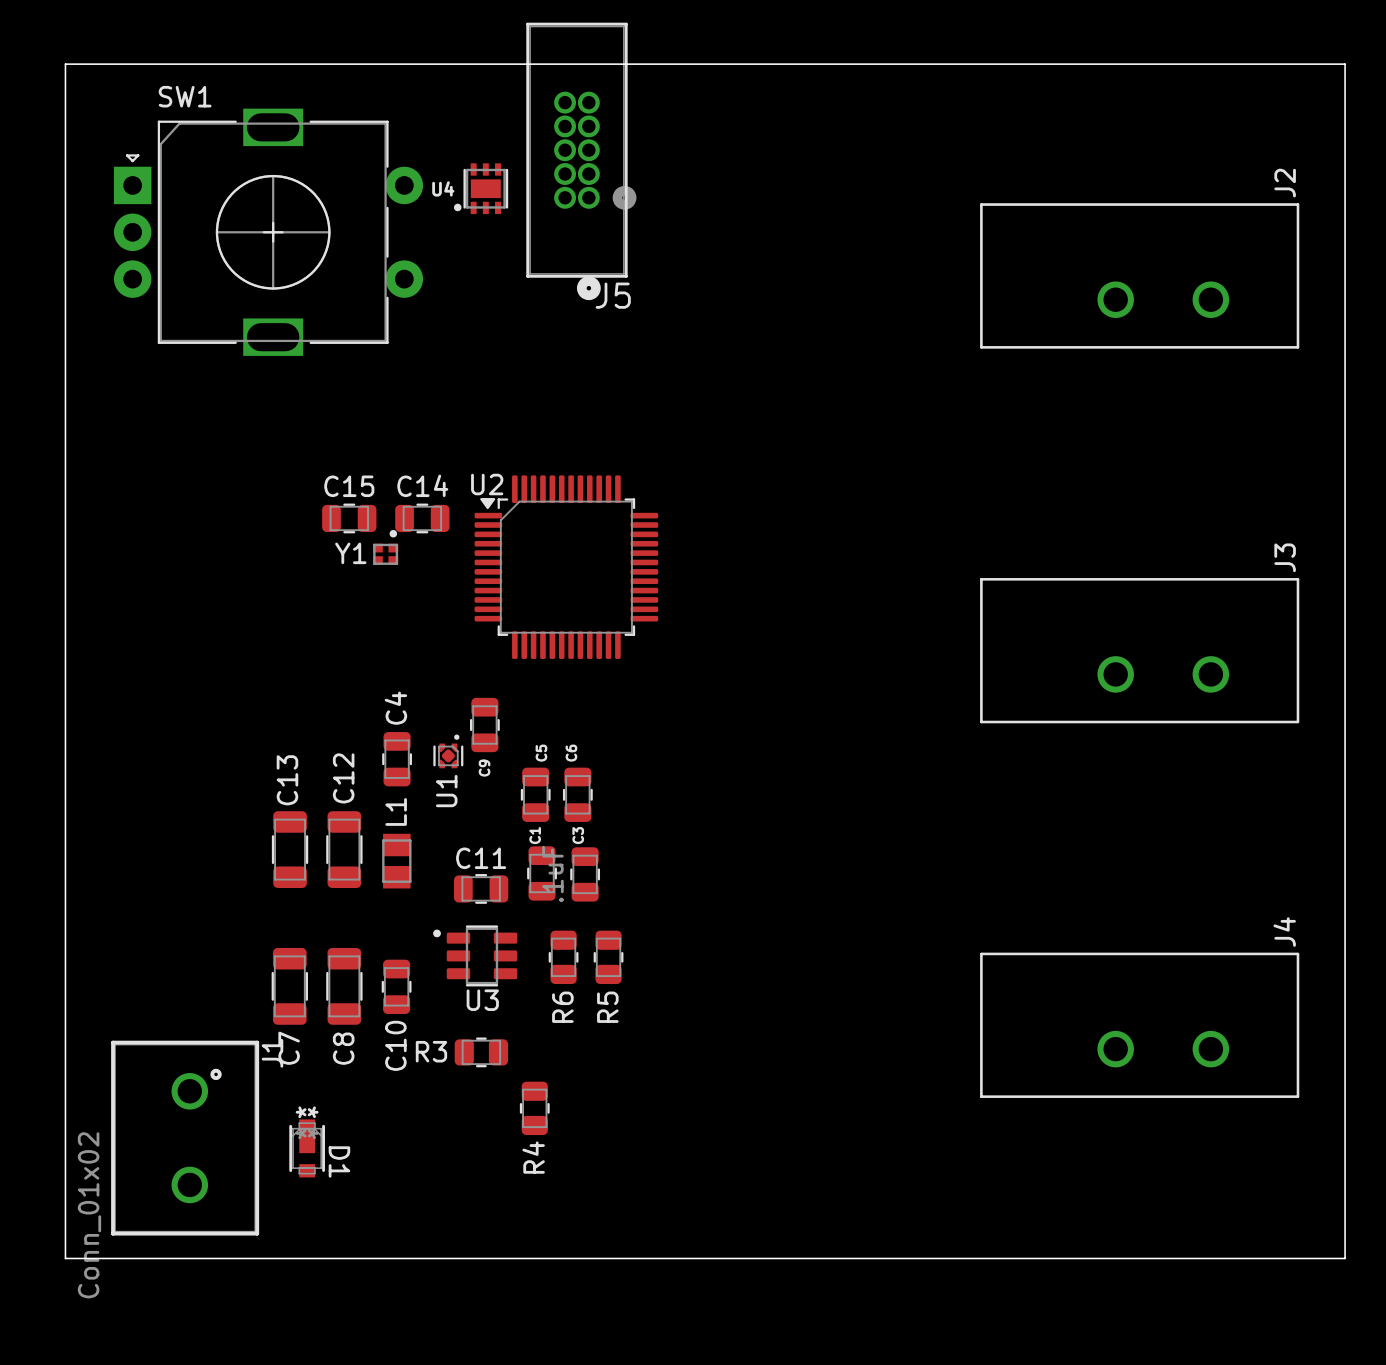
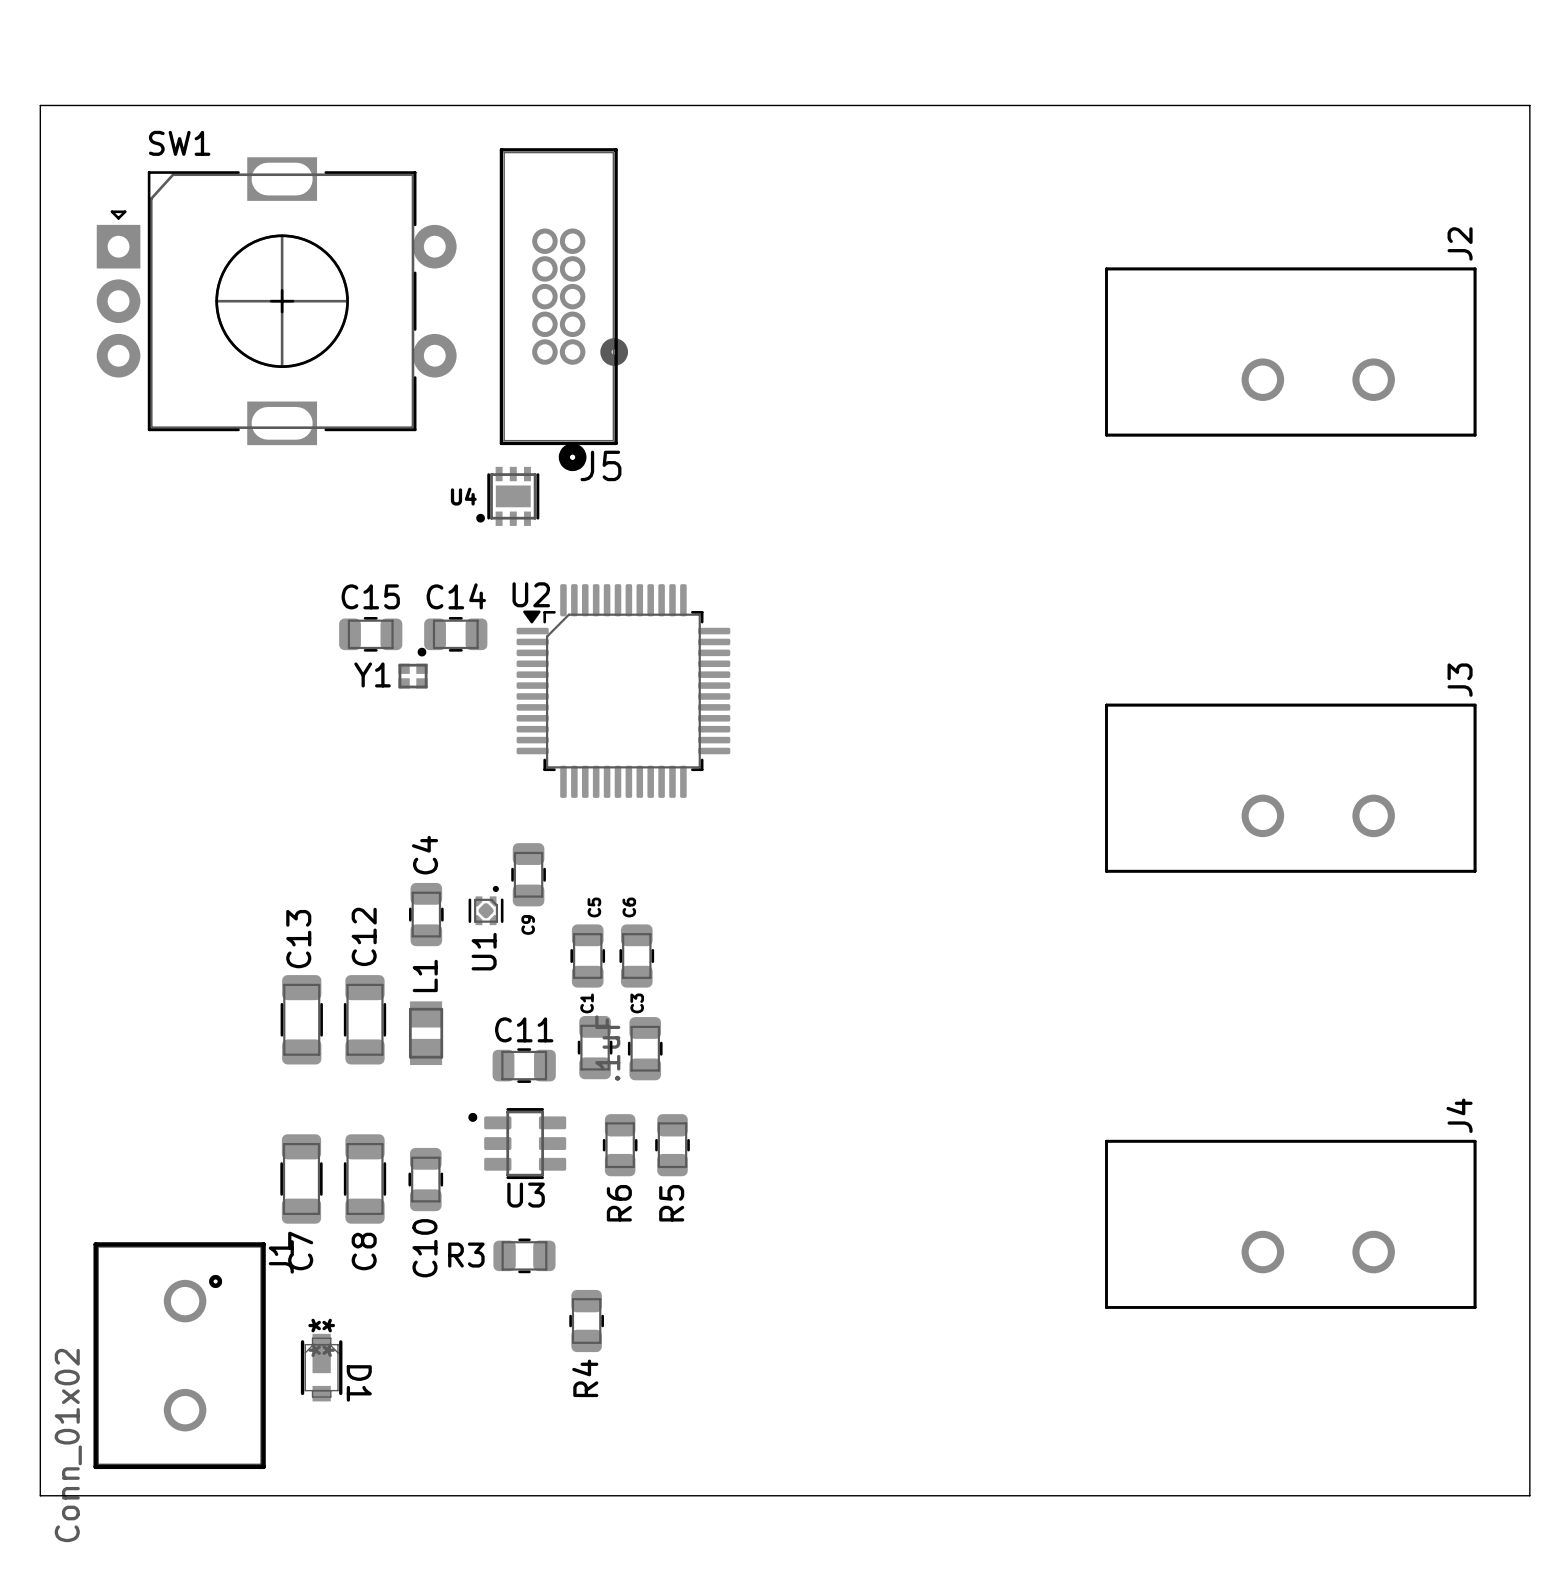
J5 position: (581, 161) -> (563, 309)
U4 position: (481, 188) -> (507, 496)

